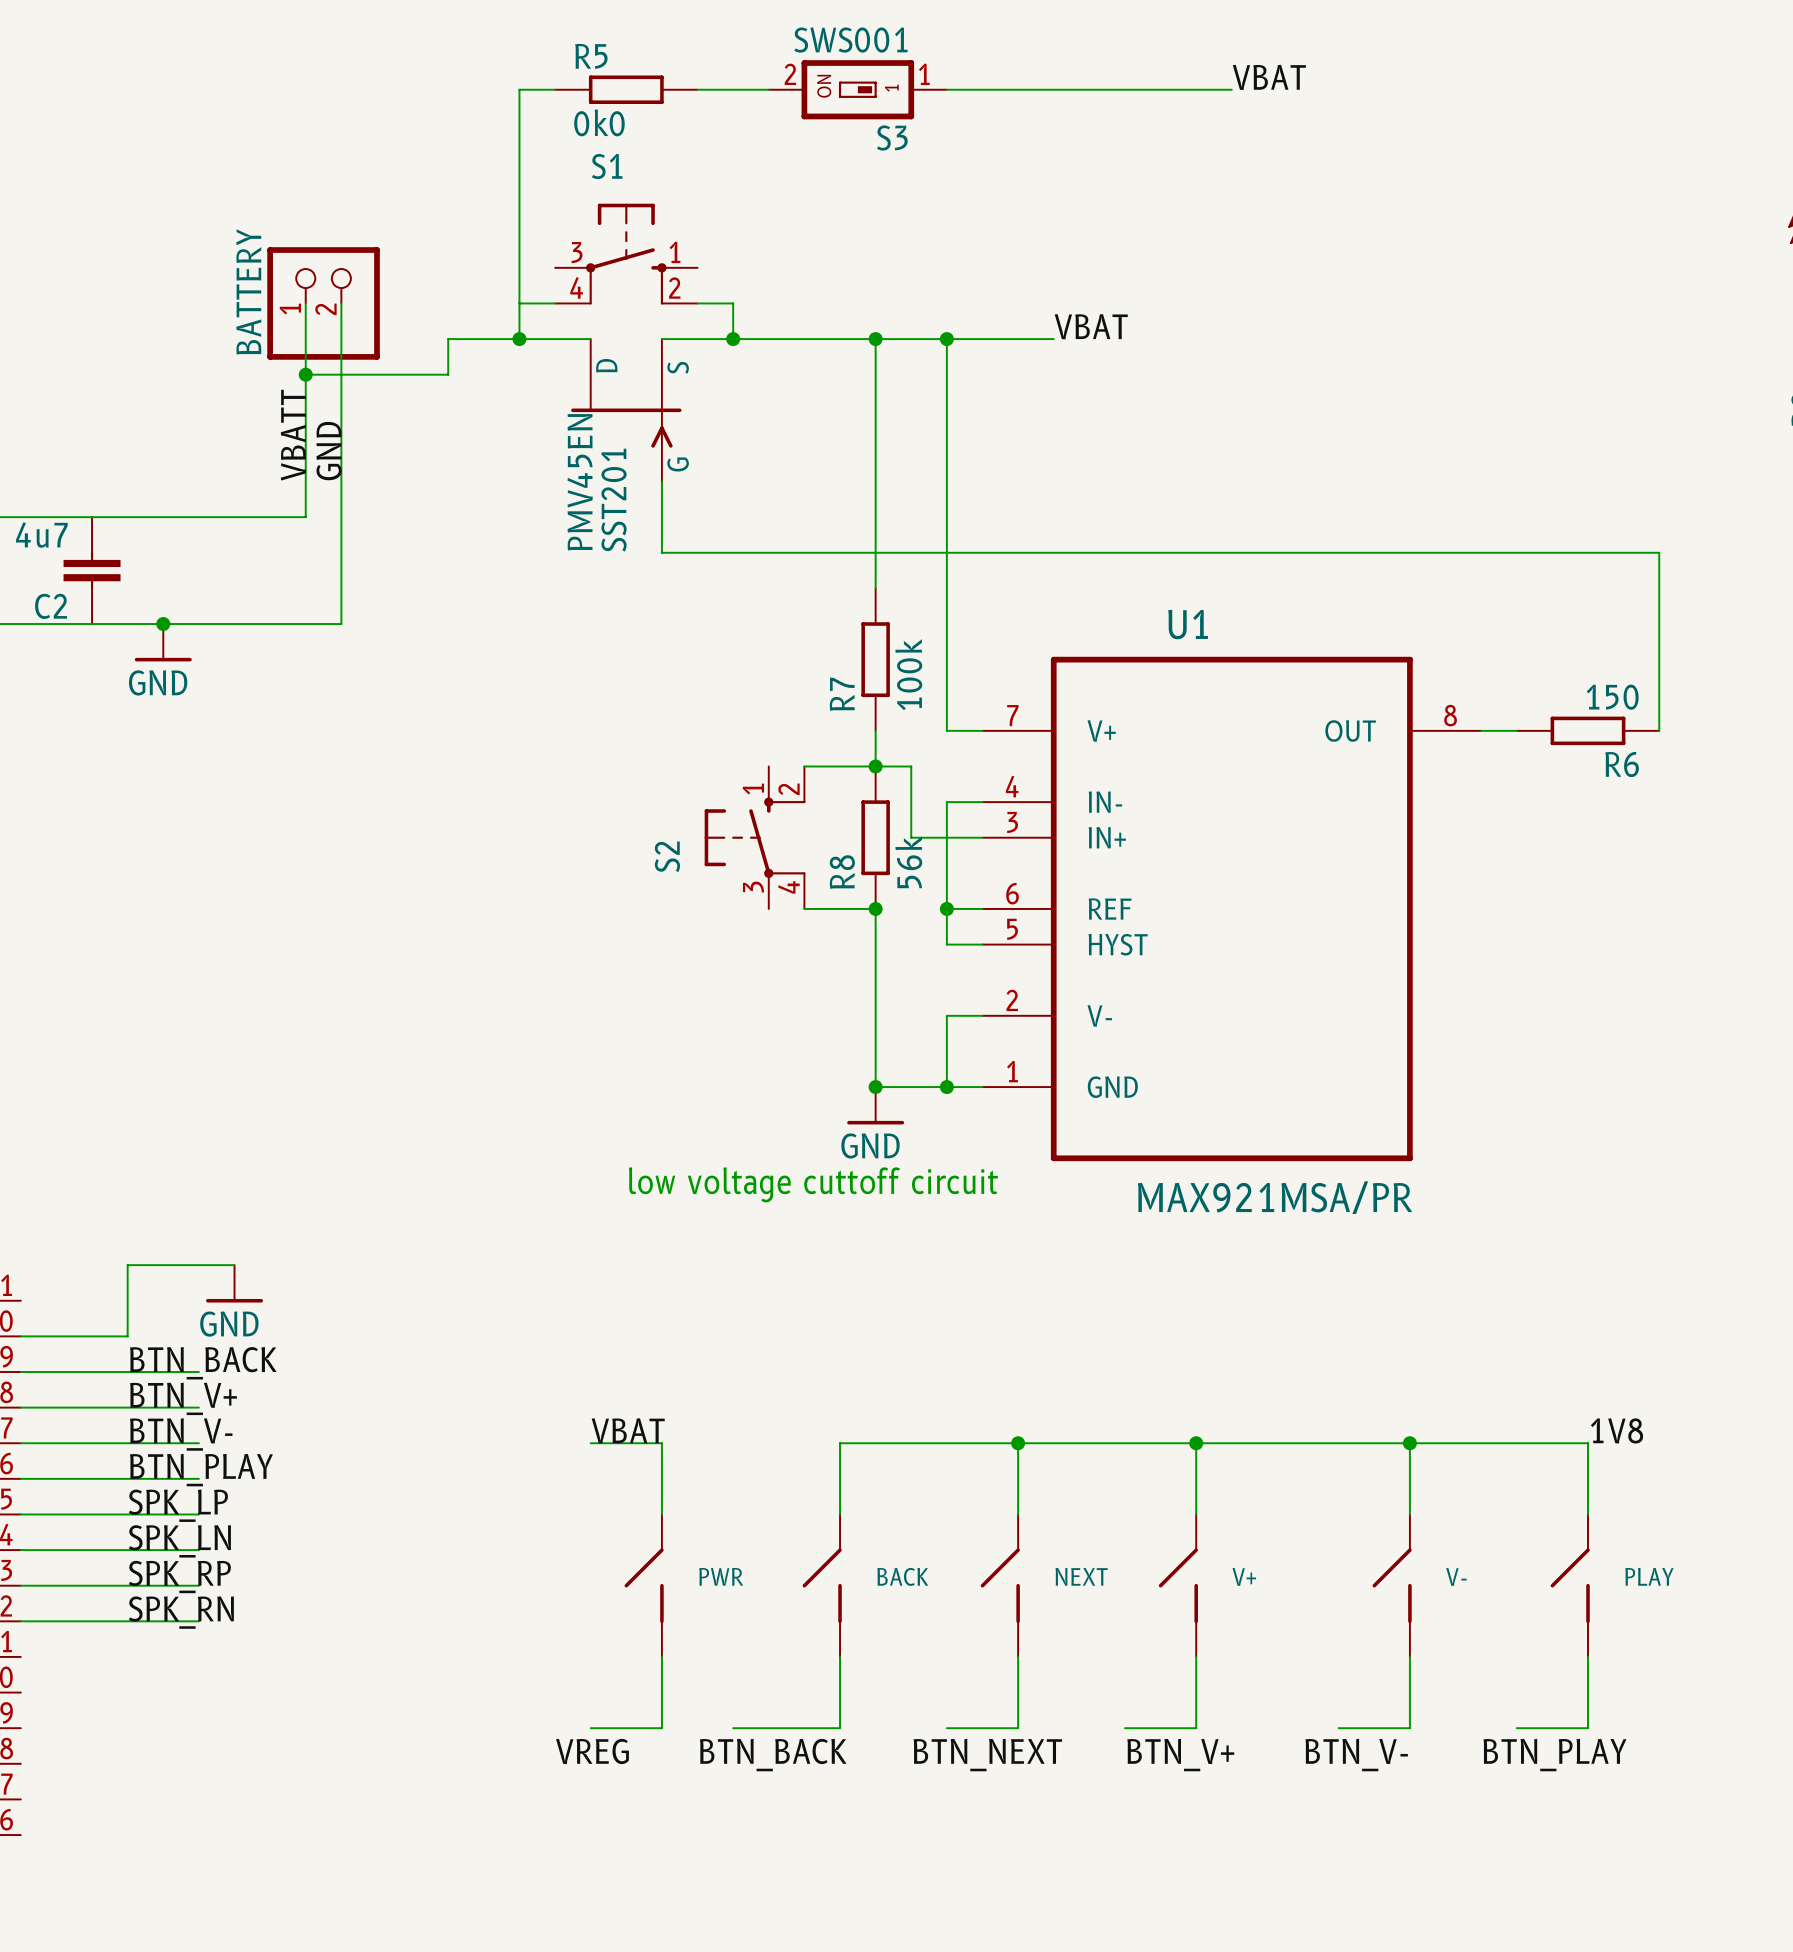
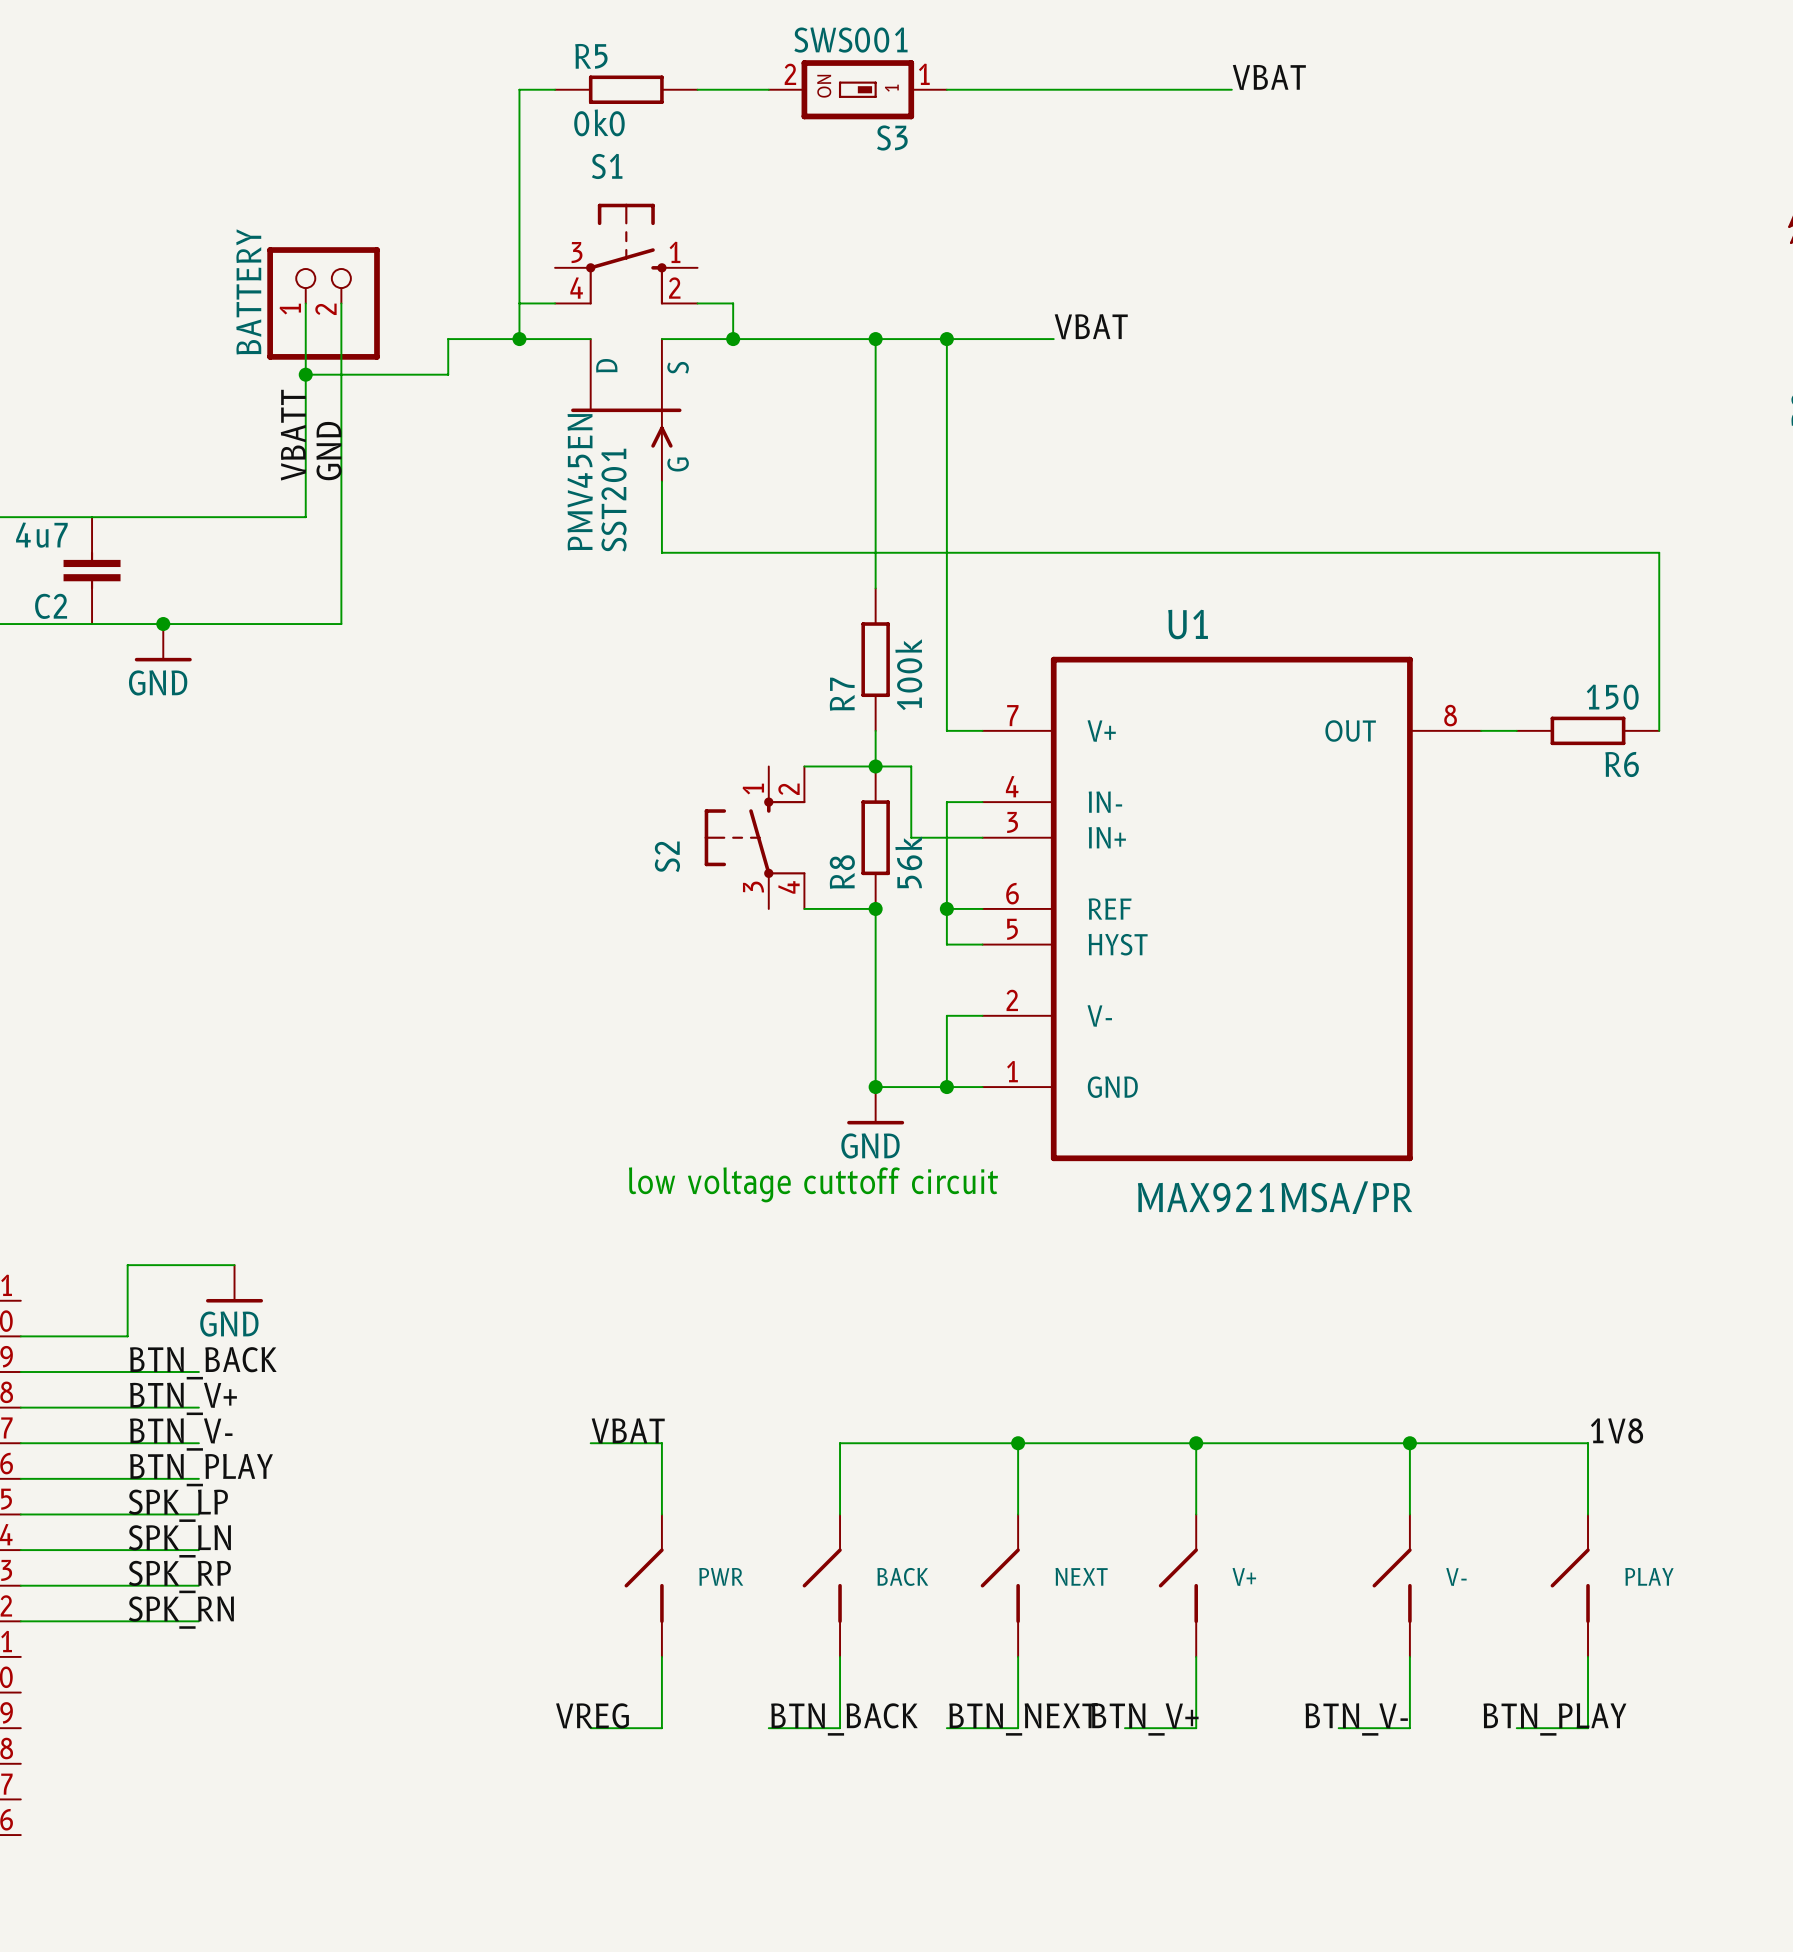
wire: (733, 1728) (768, 1728) -> none
label position: VREG (592, 1751) -> VREG (592, 1715)
label position: BTN_BACK (773, 1755) -> BTN_BACK (844, 1719)
label position: BTN_NEXT (987, 1755) -> BTN_NEXT (1023, 1719)
label position: BTN_V+ (1180, 1755) -> BTN_V+ (1145, 1719)
label position: BTN_V- (1356, 1755) -> BTN_V- (1356, 1719)
label position: BTN_PLAY (1554, 1755) -> BTN_PLAY (1554, 1719)

